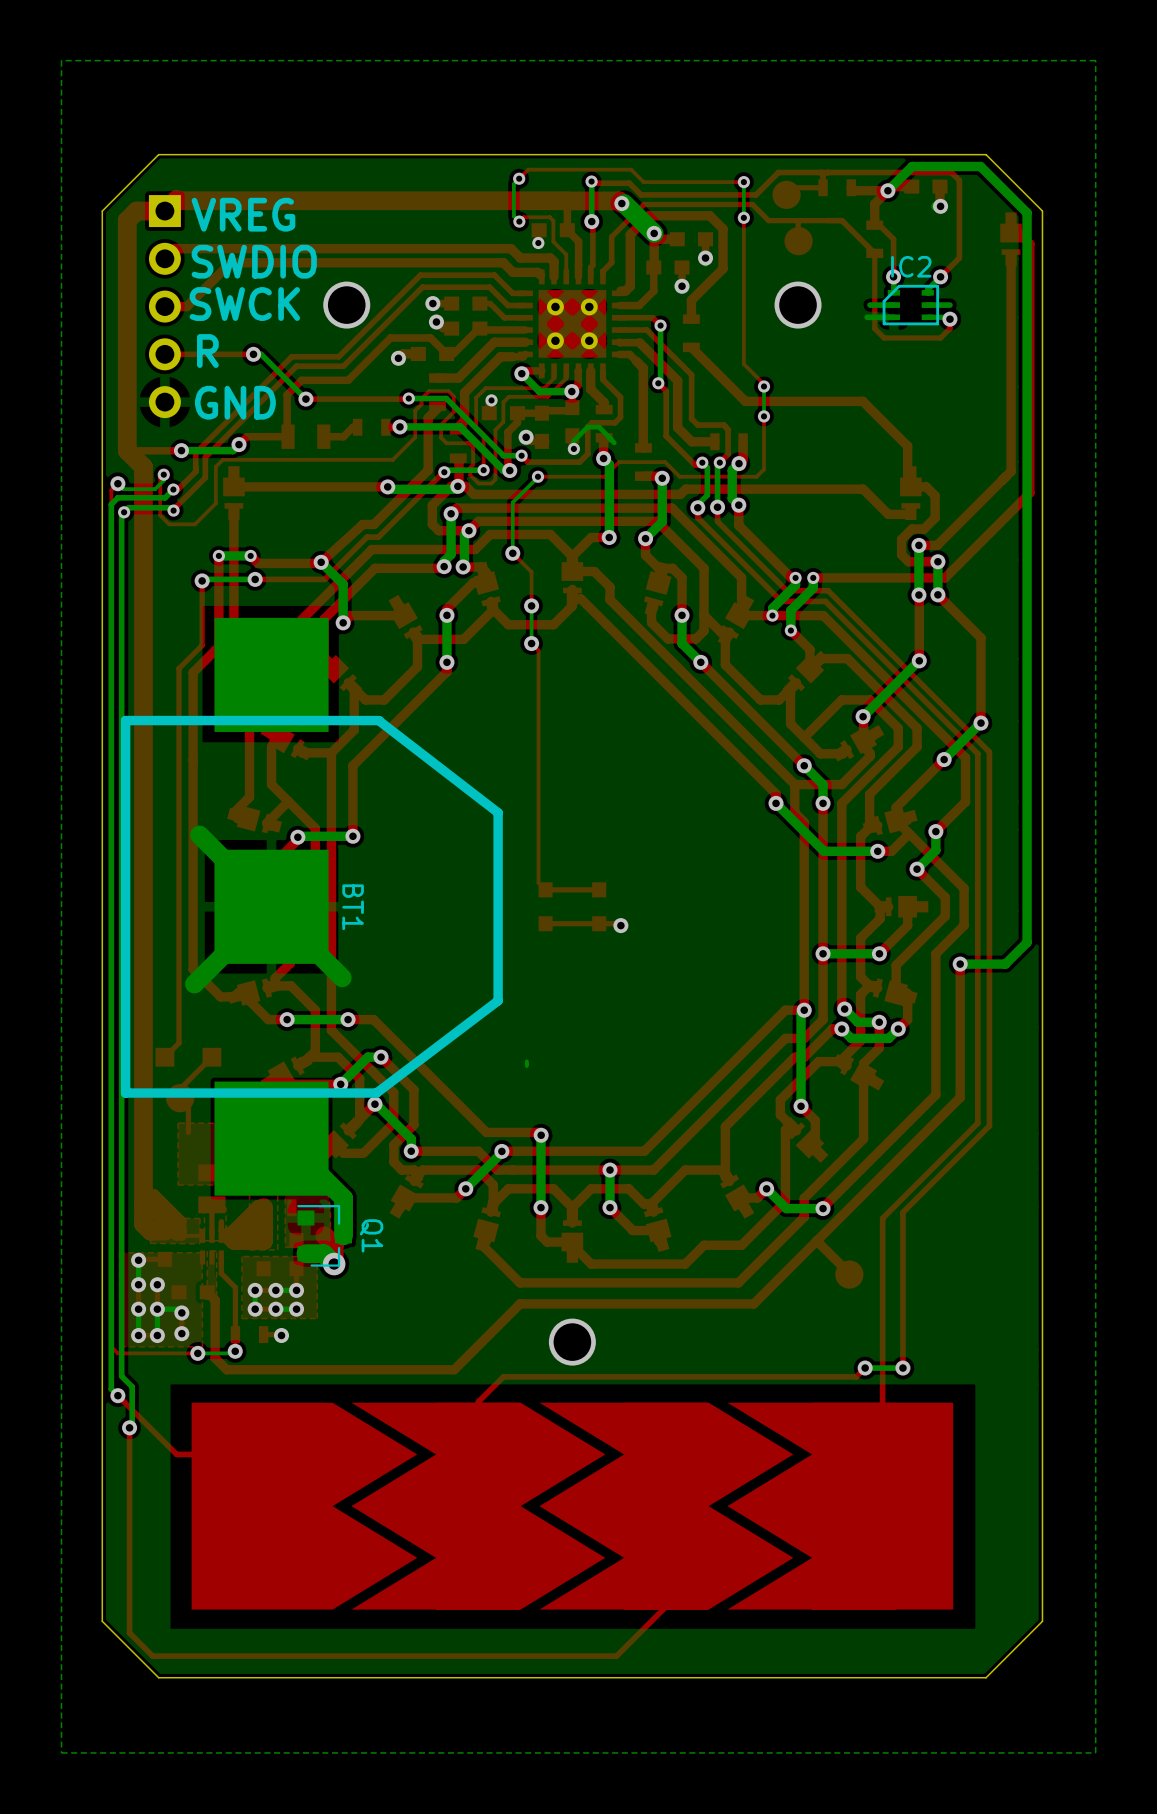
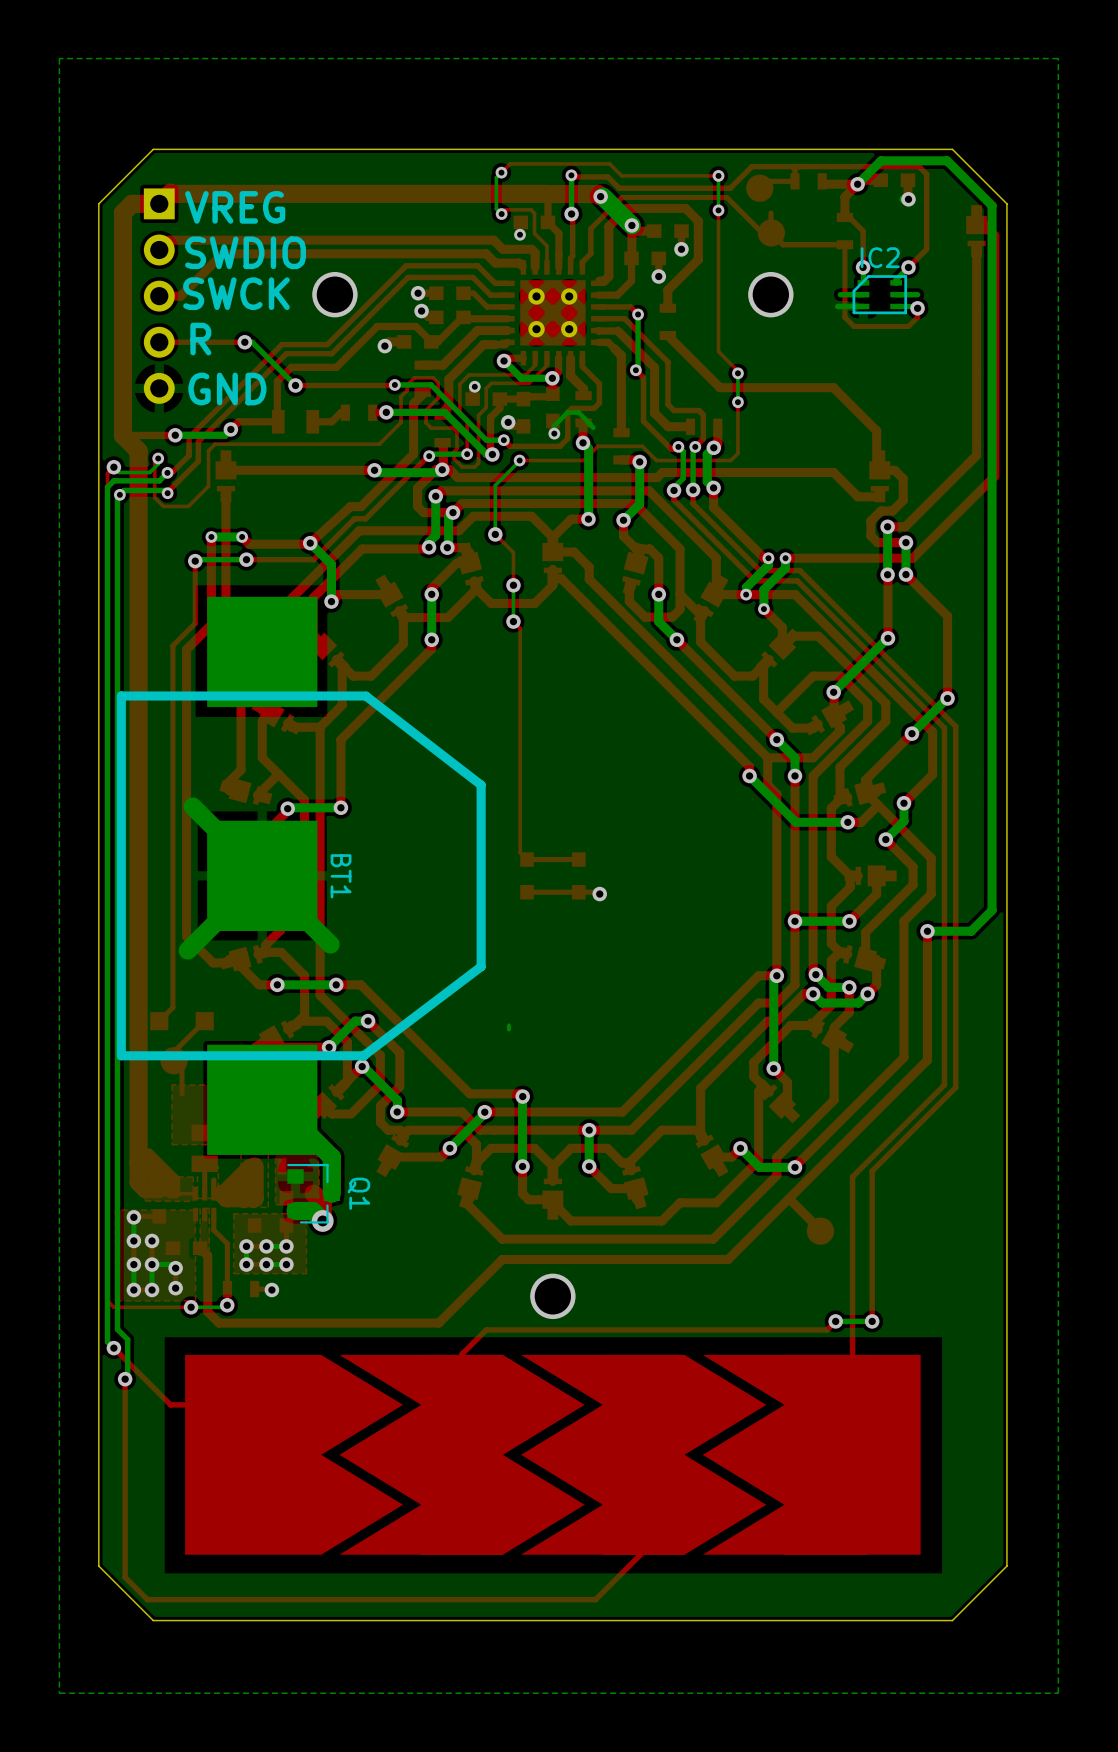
top track: (768, 220) (842, 220) (874, 253) -> (771, 232) (783, 244) (844, 244)
top track: none -> (742, 213) (762, 232)

